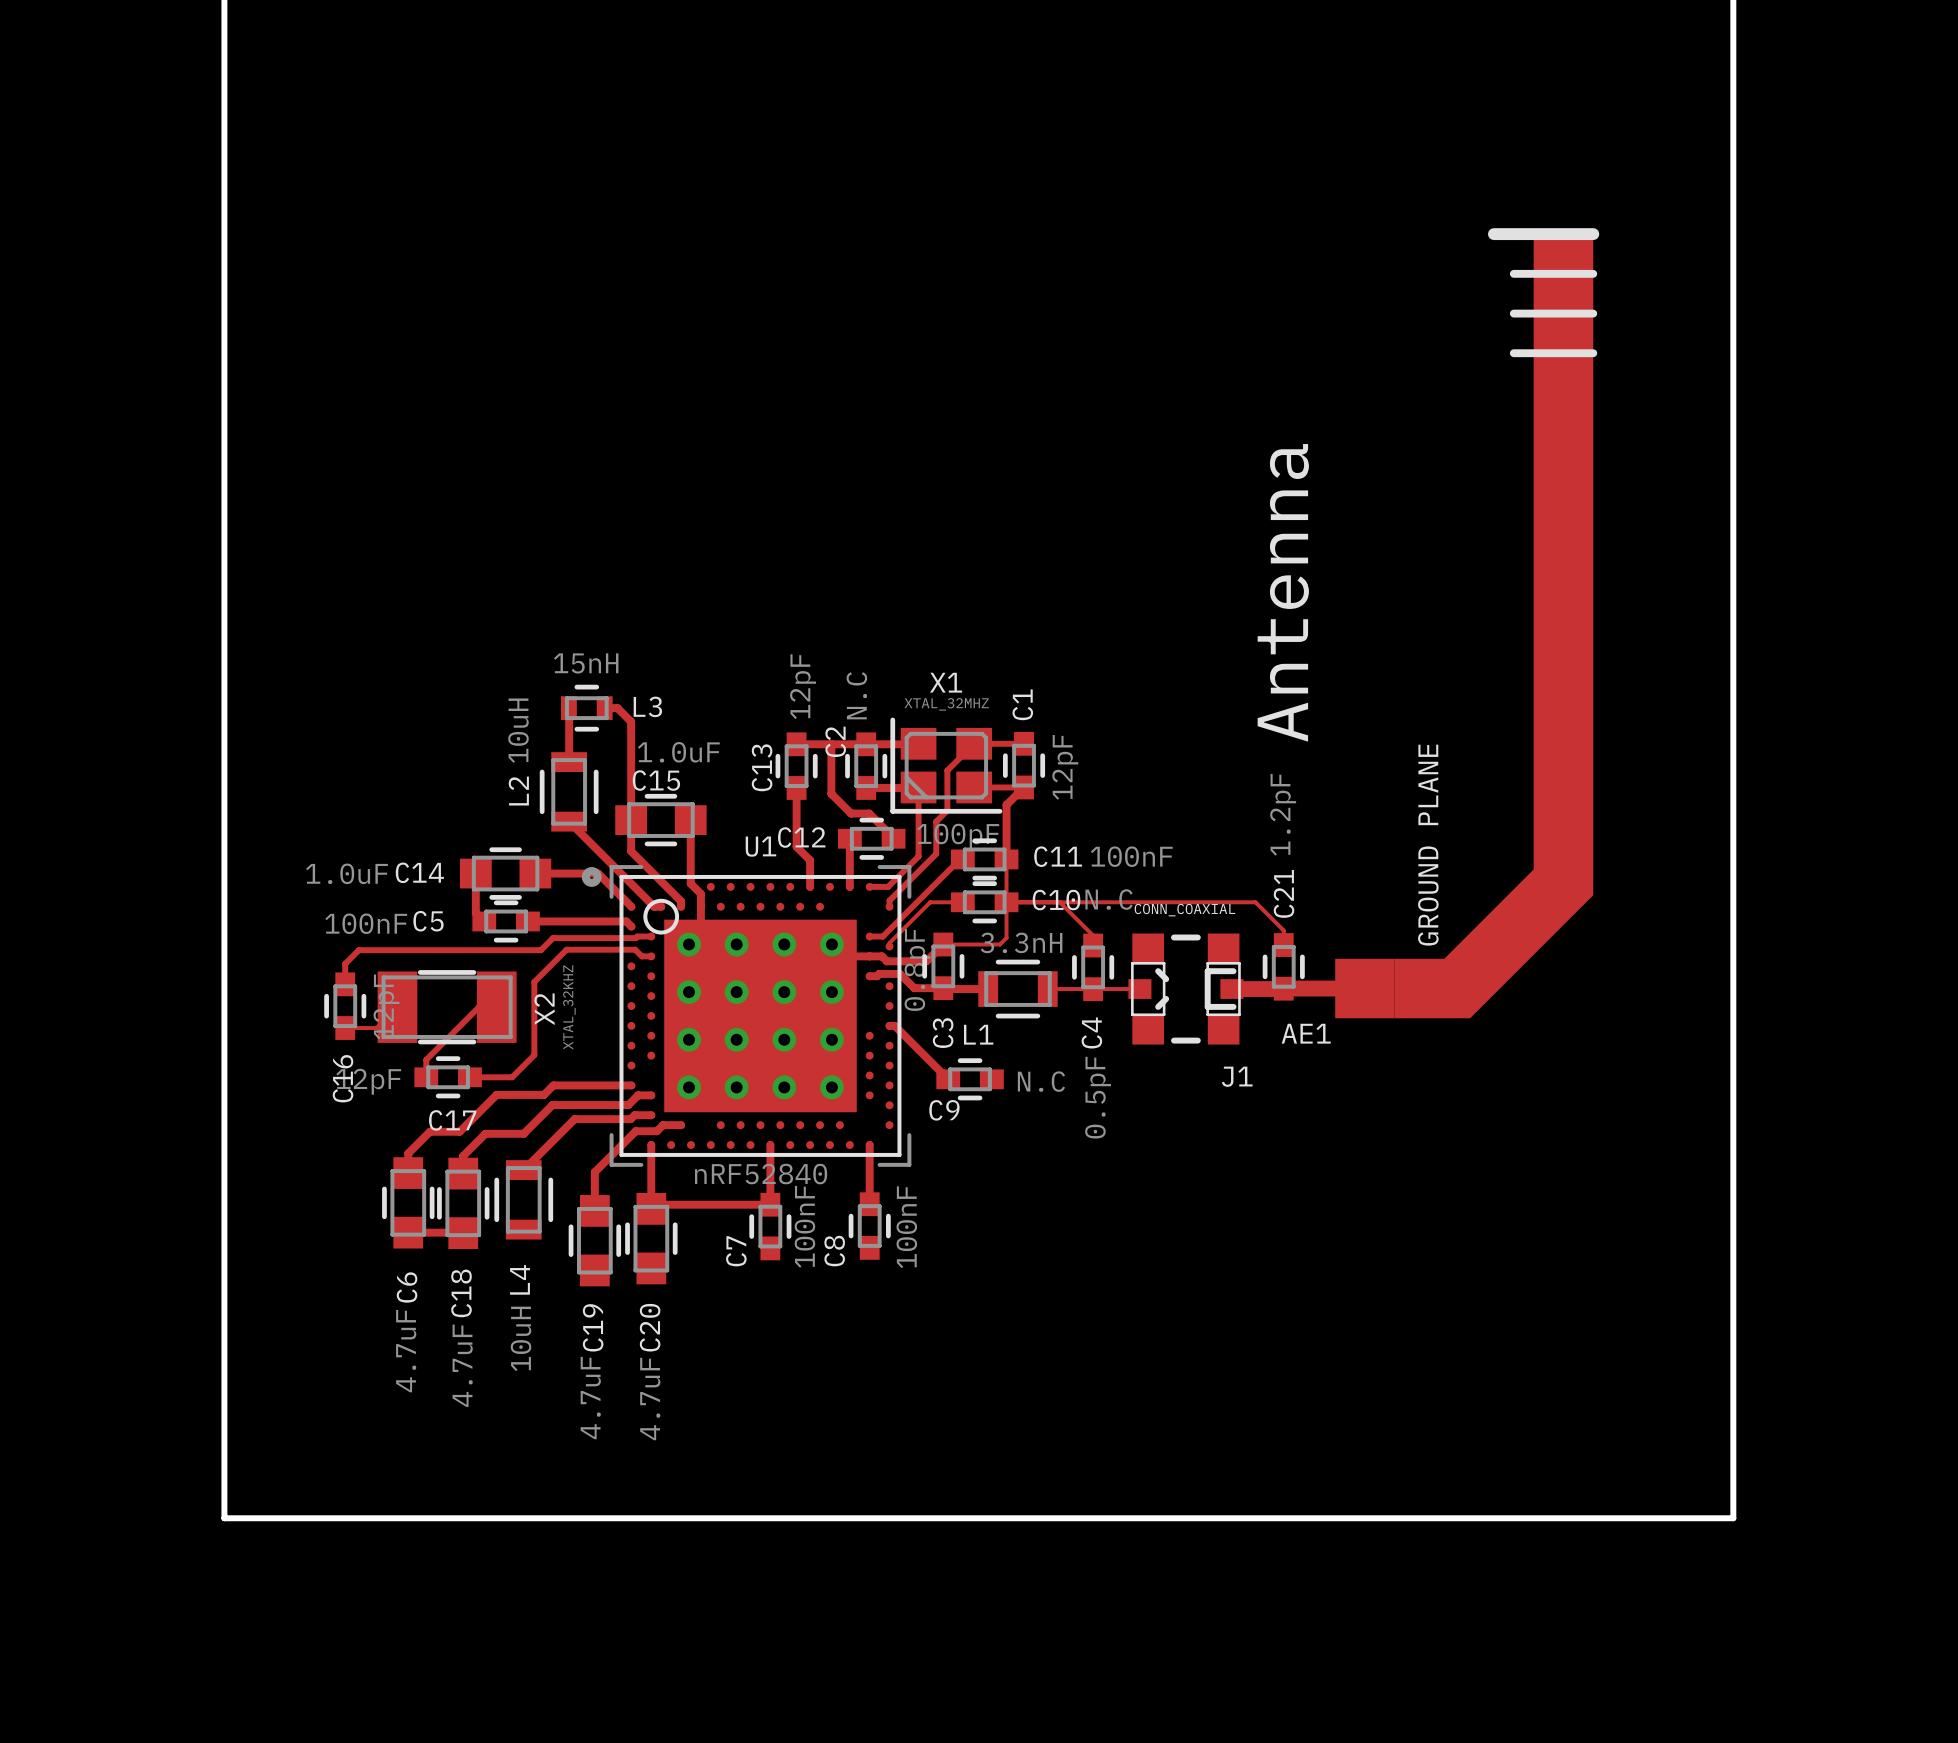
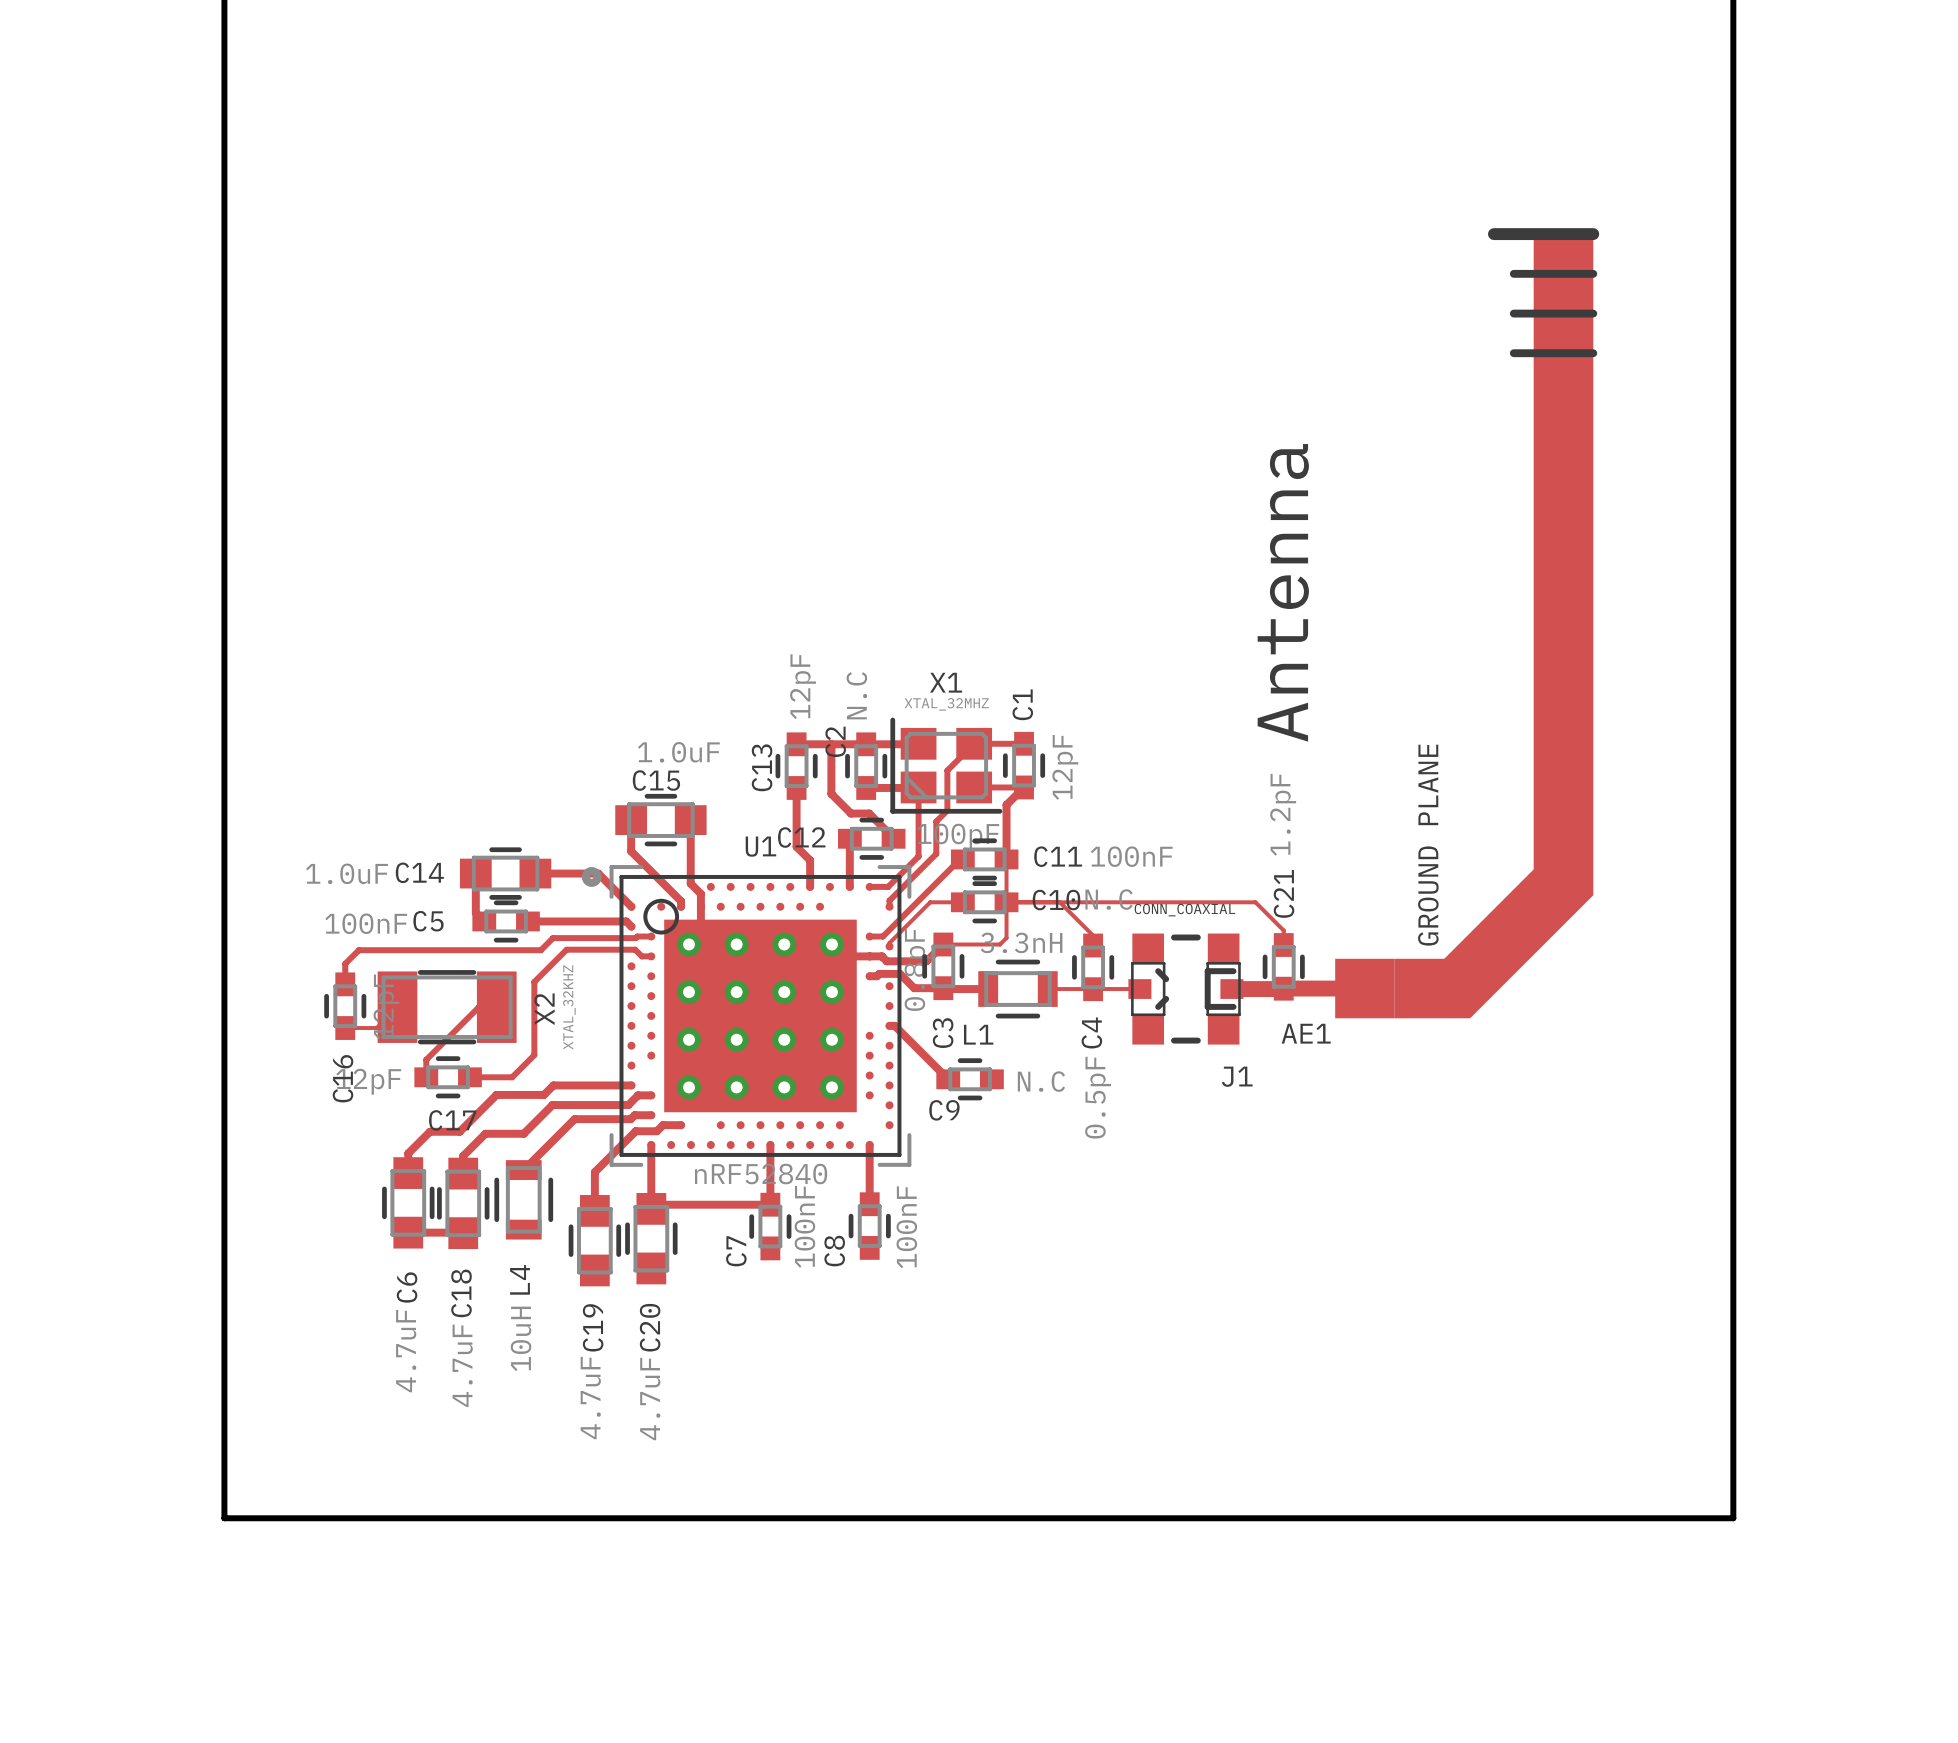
track: (569, 708) (569, 762) -> none
L3: 15nH (586, 708) -> none
track: (604, 708) (617, 708) (631, 721) (631, 820) -> none
L2: 10uH (569, 791) -> none
track: (582, 821) (569, 821) (654, 906) (661, 906) -> none

